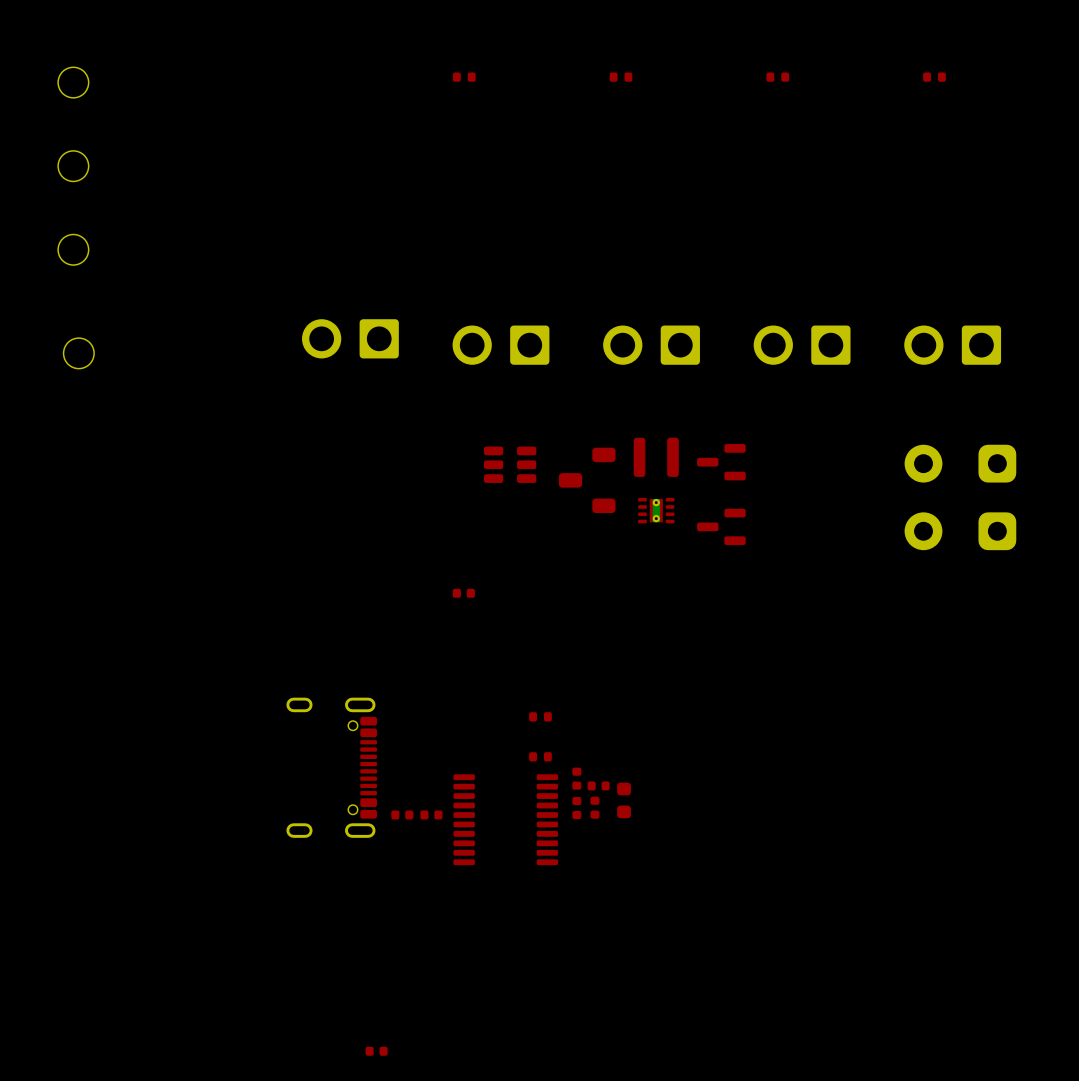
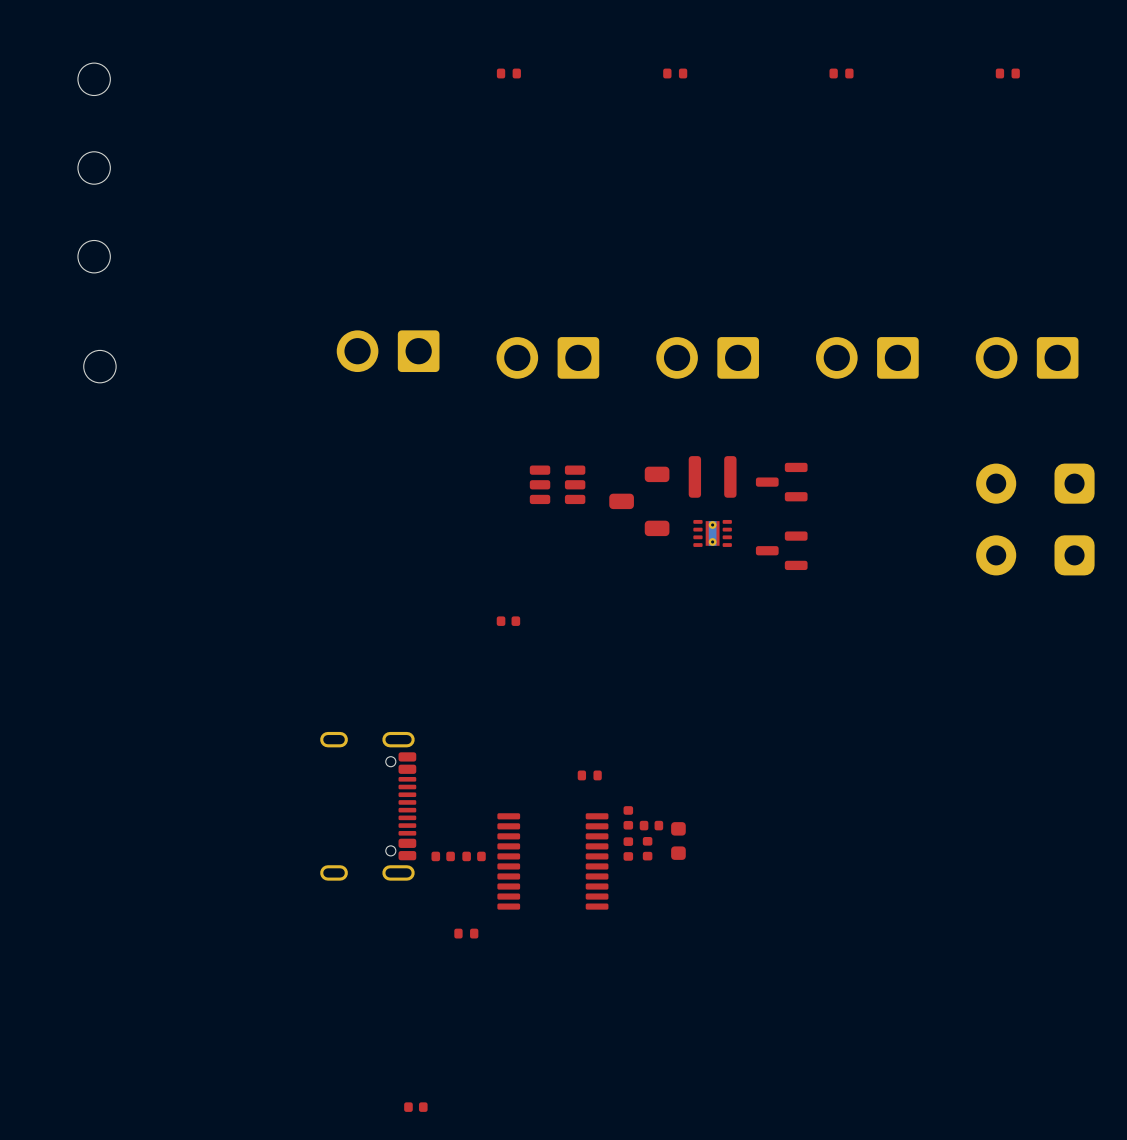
part: (540, 716) -> none
part: none -> (589, 775)
part: (540, 756) -> none
part: none -> (466, 933)

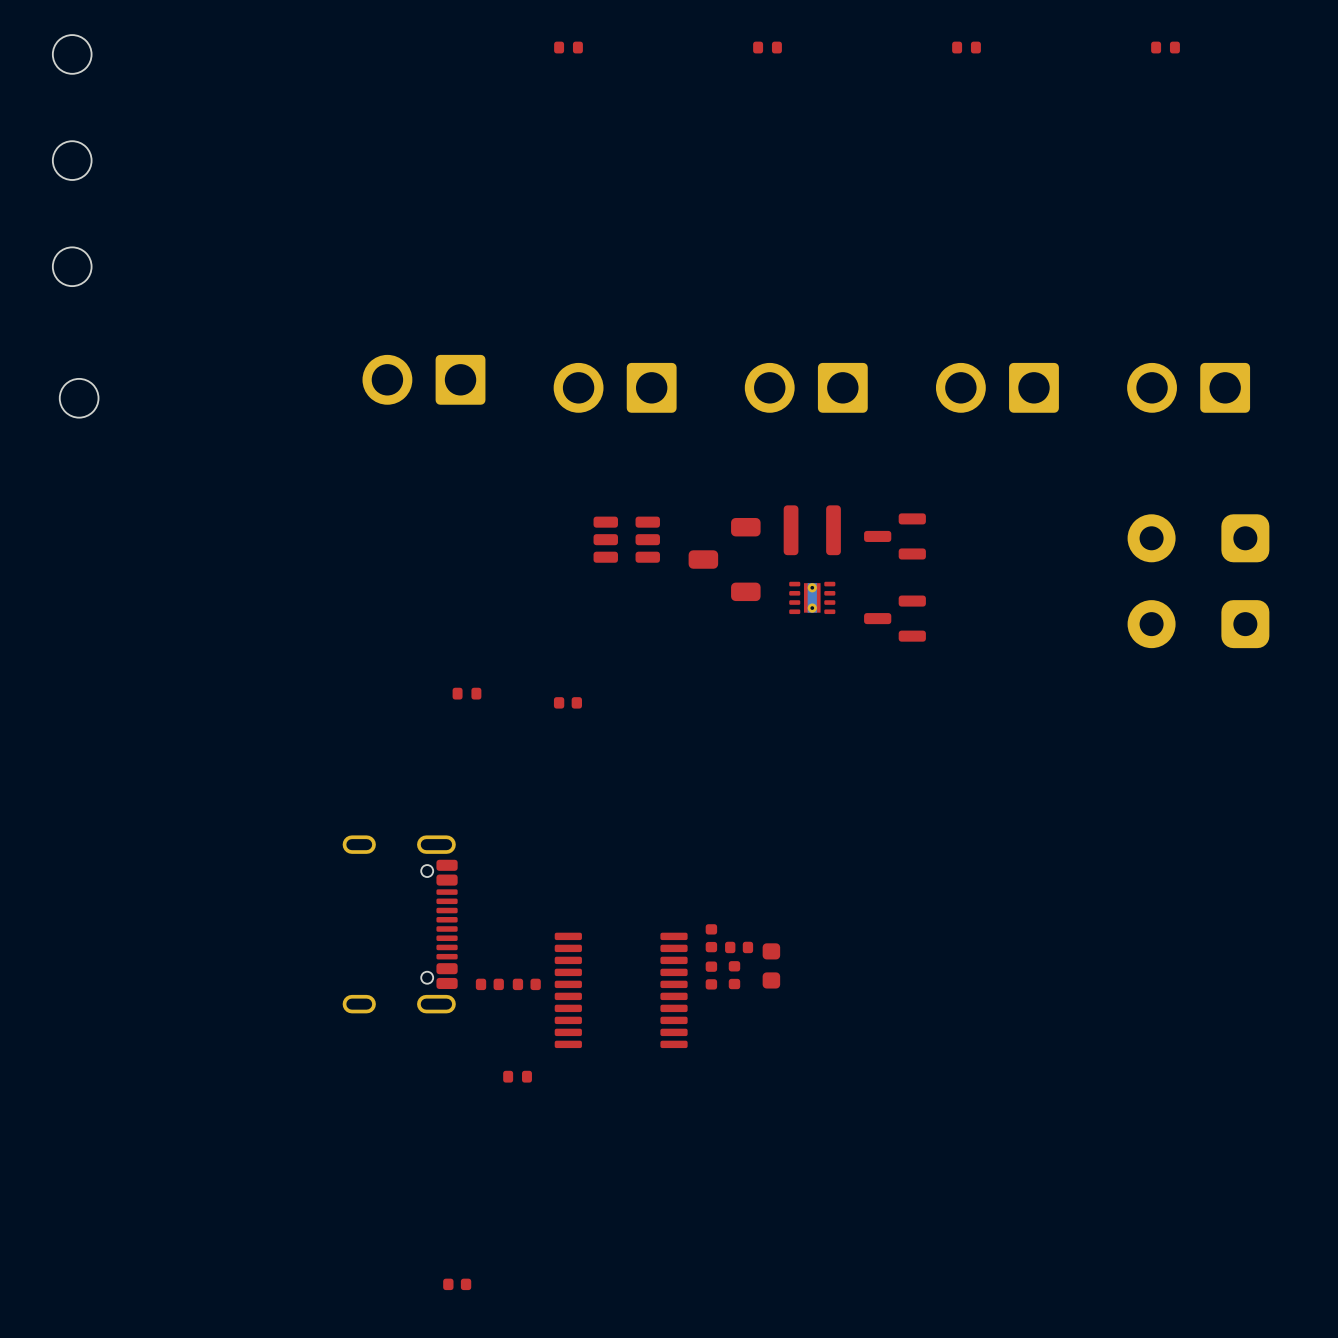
part position: (589, 775) -> (466, 693)

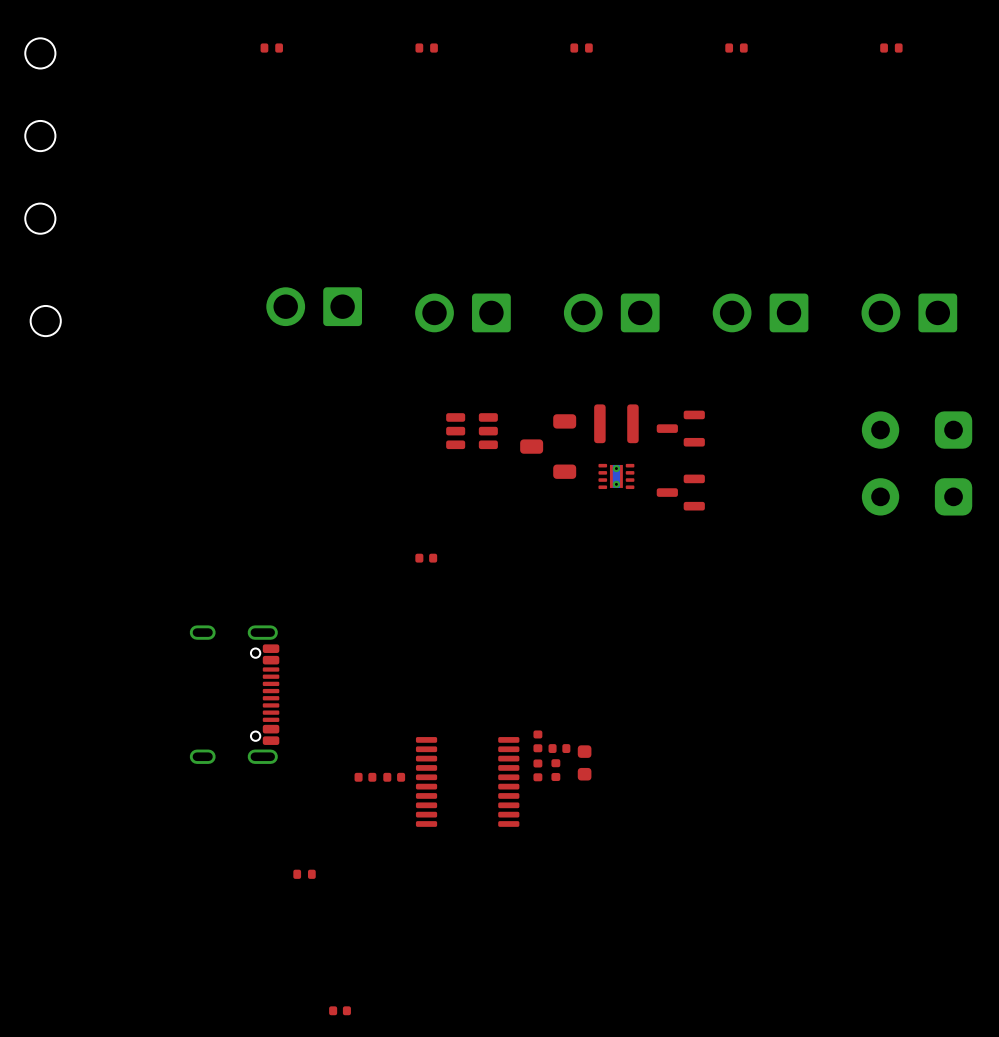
part: none -> (271, 48)
part: (466, 693) -> none
part position: (400, 924) -> (234, 694)
part position: (517, 1076) -> (304, 874)

